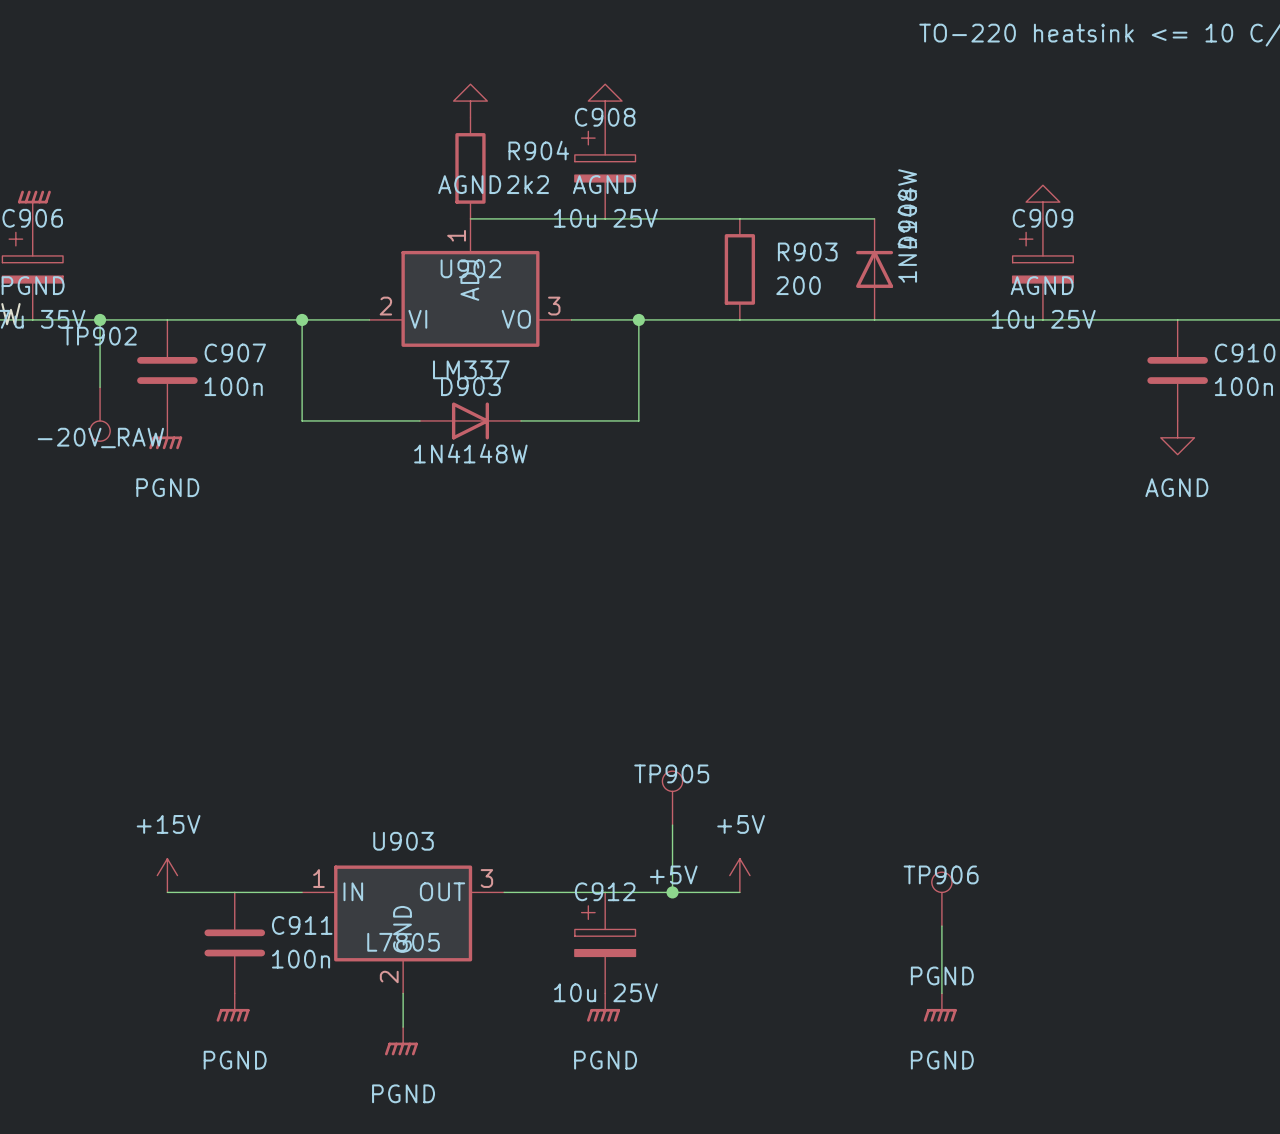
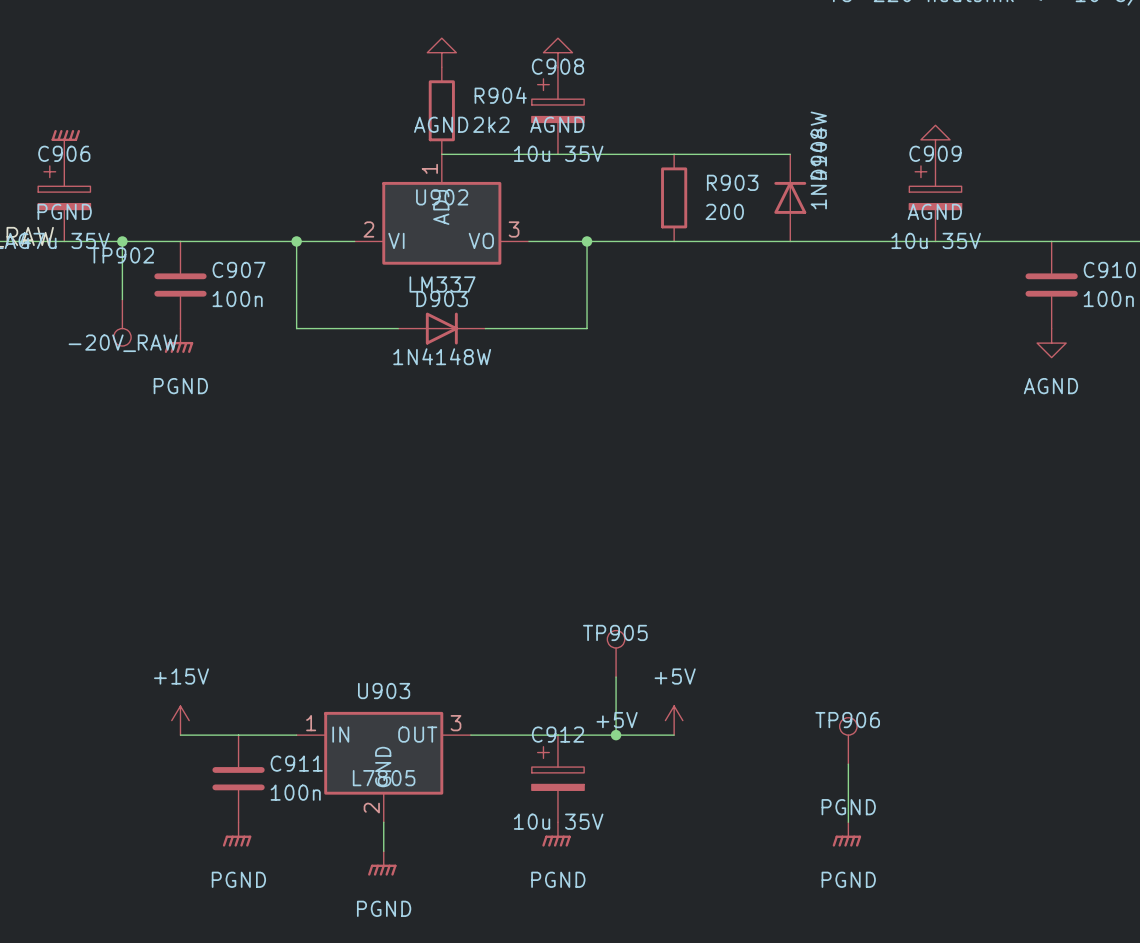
C908 value: 10u 25V (605, 218) -> 10u 35V (558, 153)
C909 value: 10u 25V (1043, 319) -> 10u 35V (936, 240)
C912 value: 10u 25V (605, 992) -> 10u 35V (558, 821)

